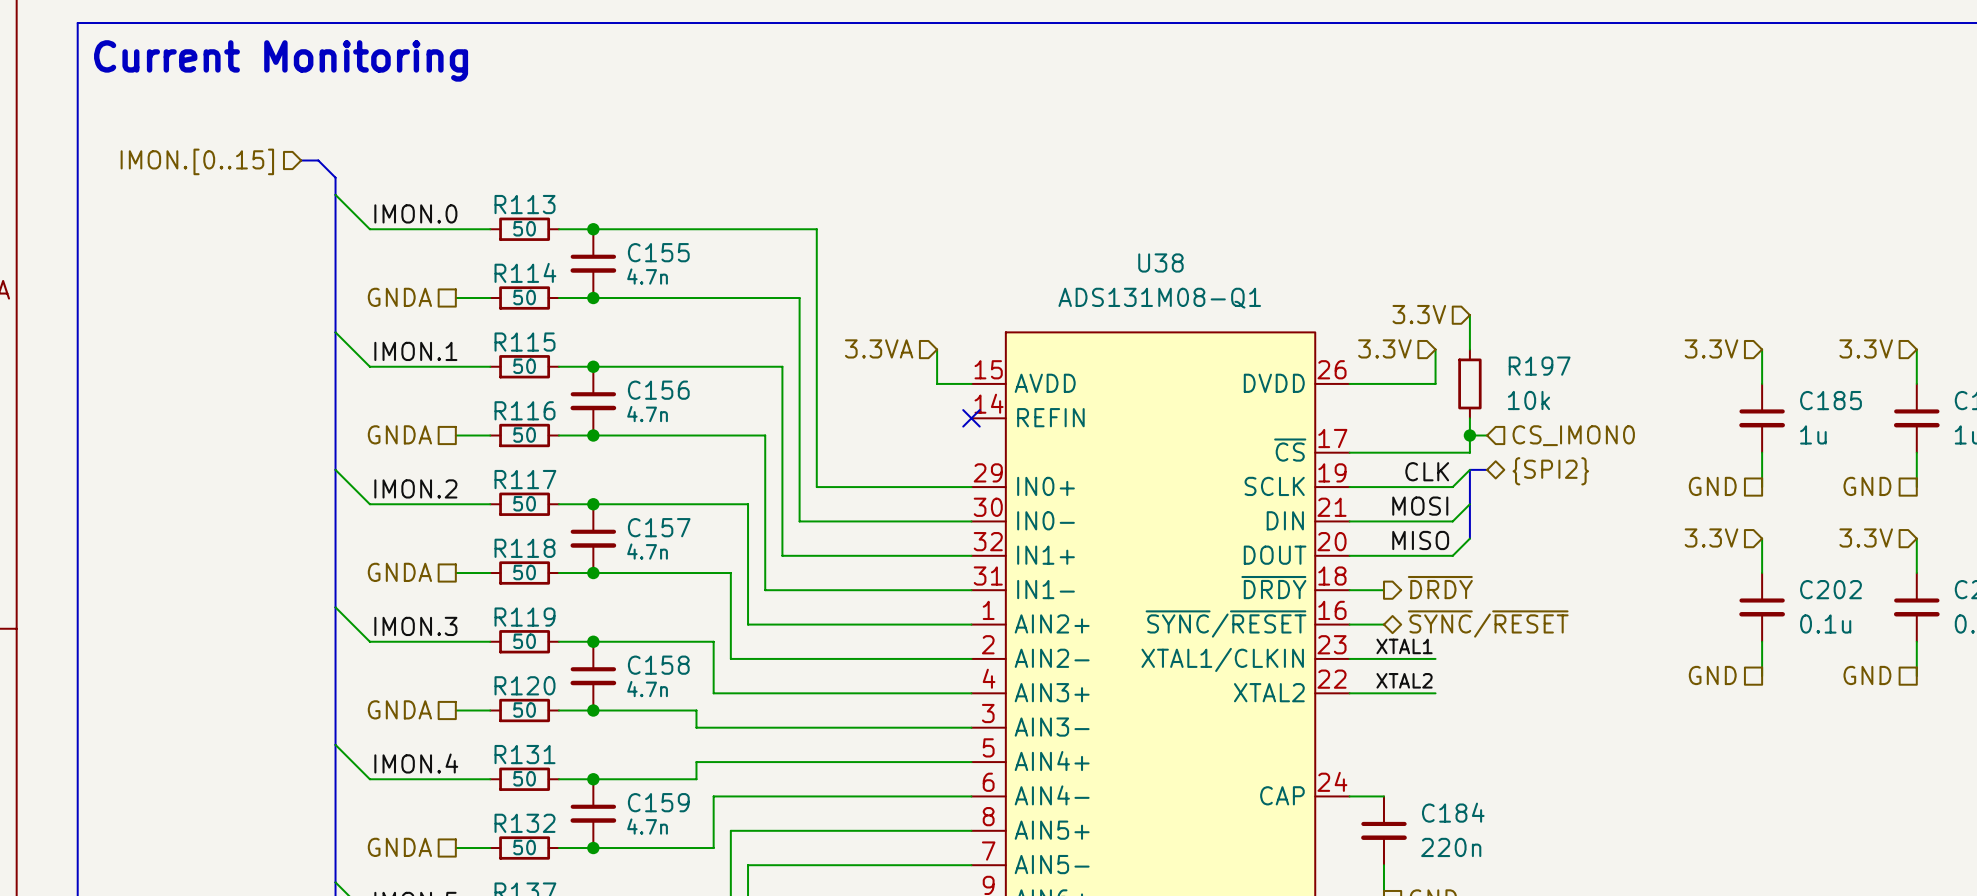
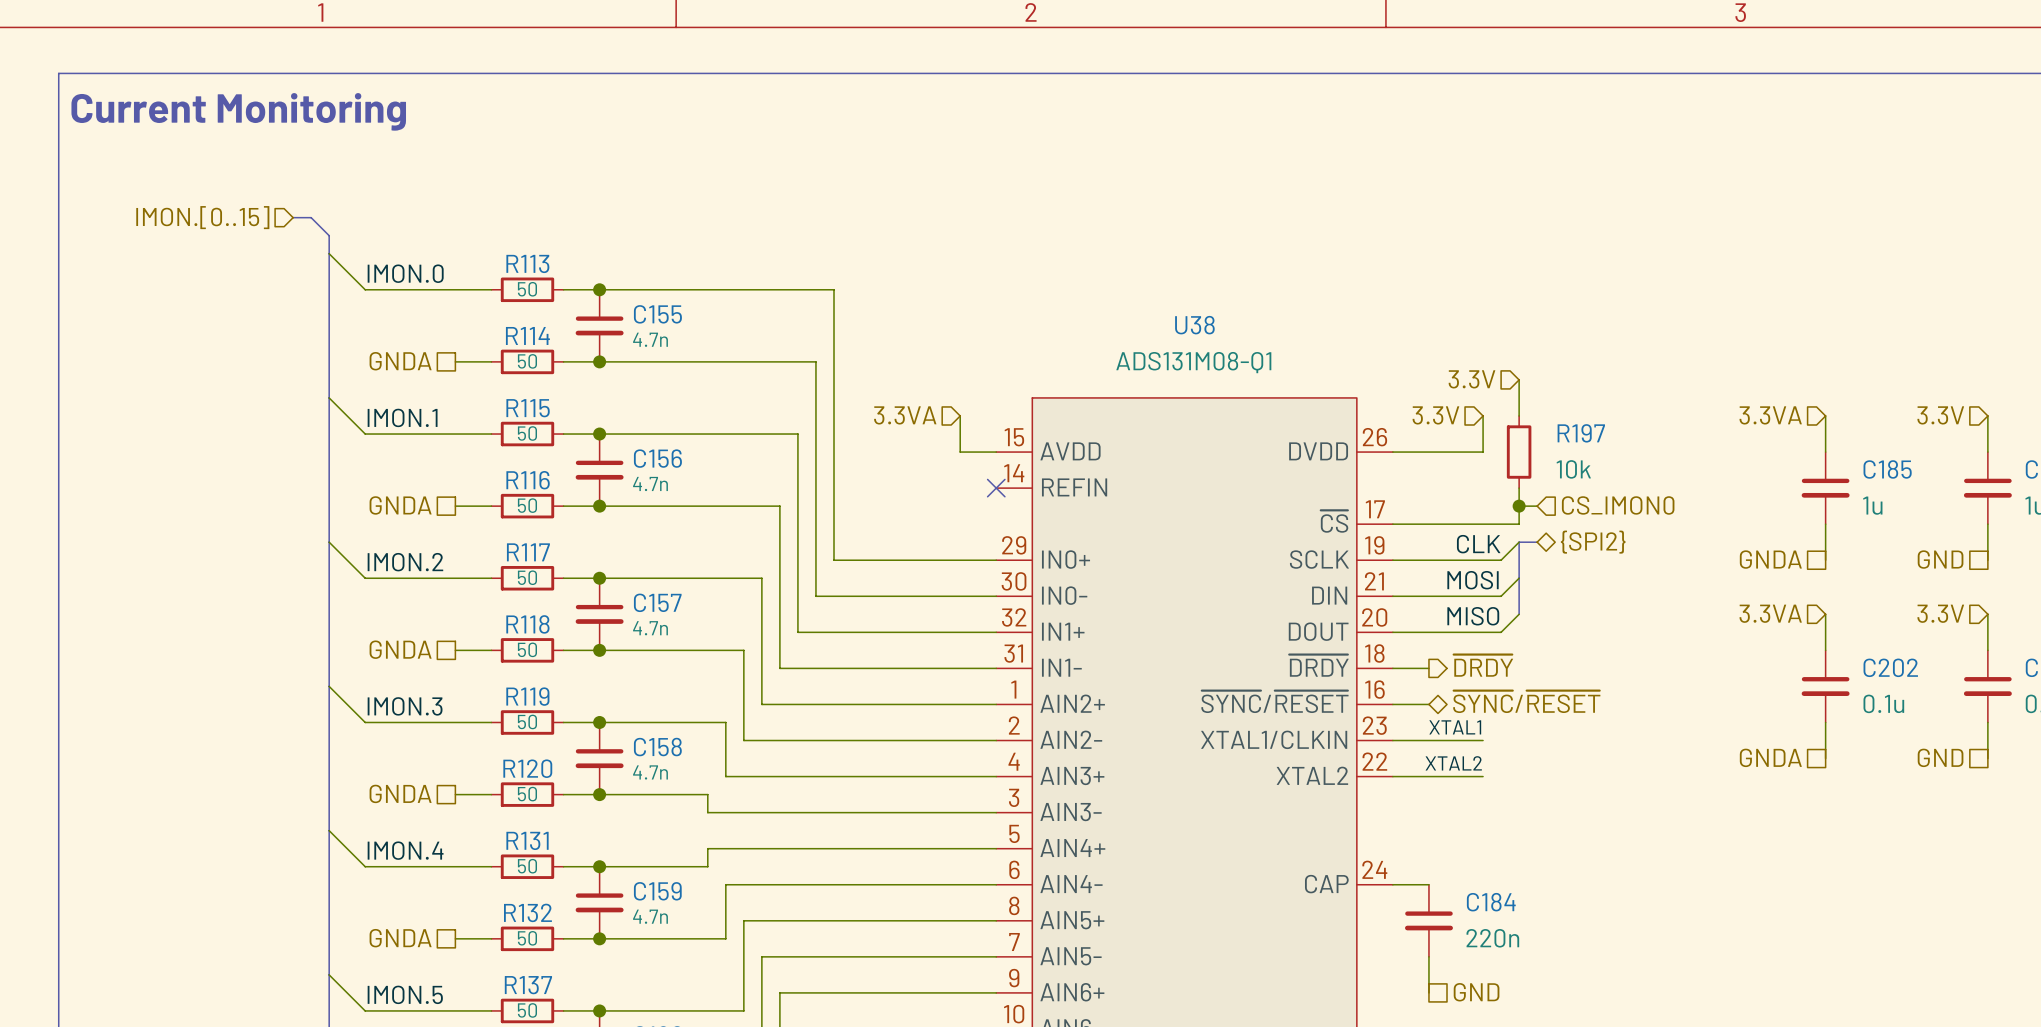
hierarchical label: 3.3V (1711, 348) -> 3.3VA (1770, 415)
hierarchical label: GND (1712, 486) -> GNDA (1770, 559)
hierarchical label: 3.3V (1711, 537) -> 3.3VA (1770, 613)
hierarchical label: GND (1712, 675) -> GNDA (1770, 757)

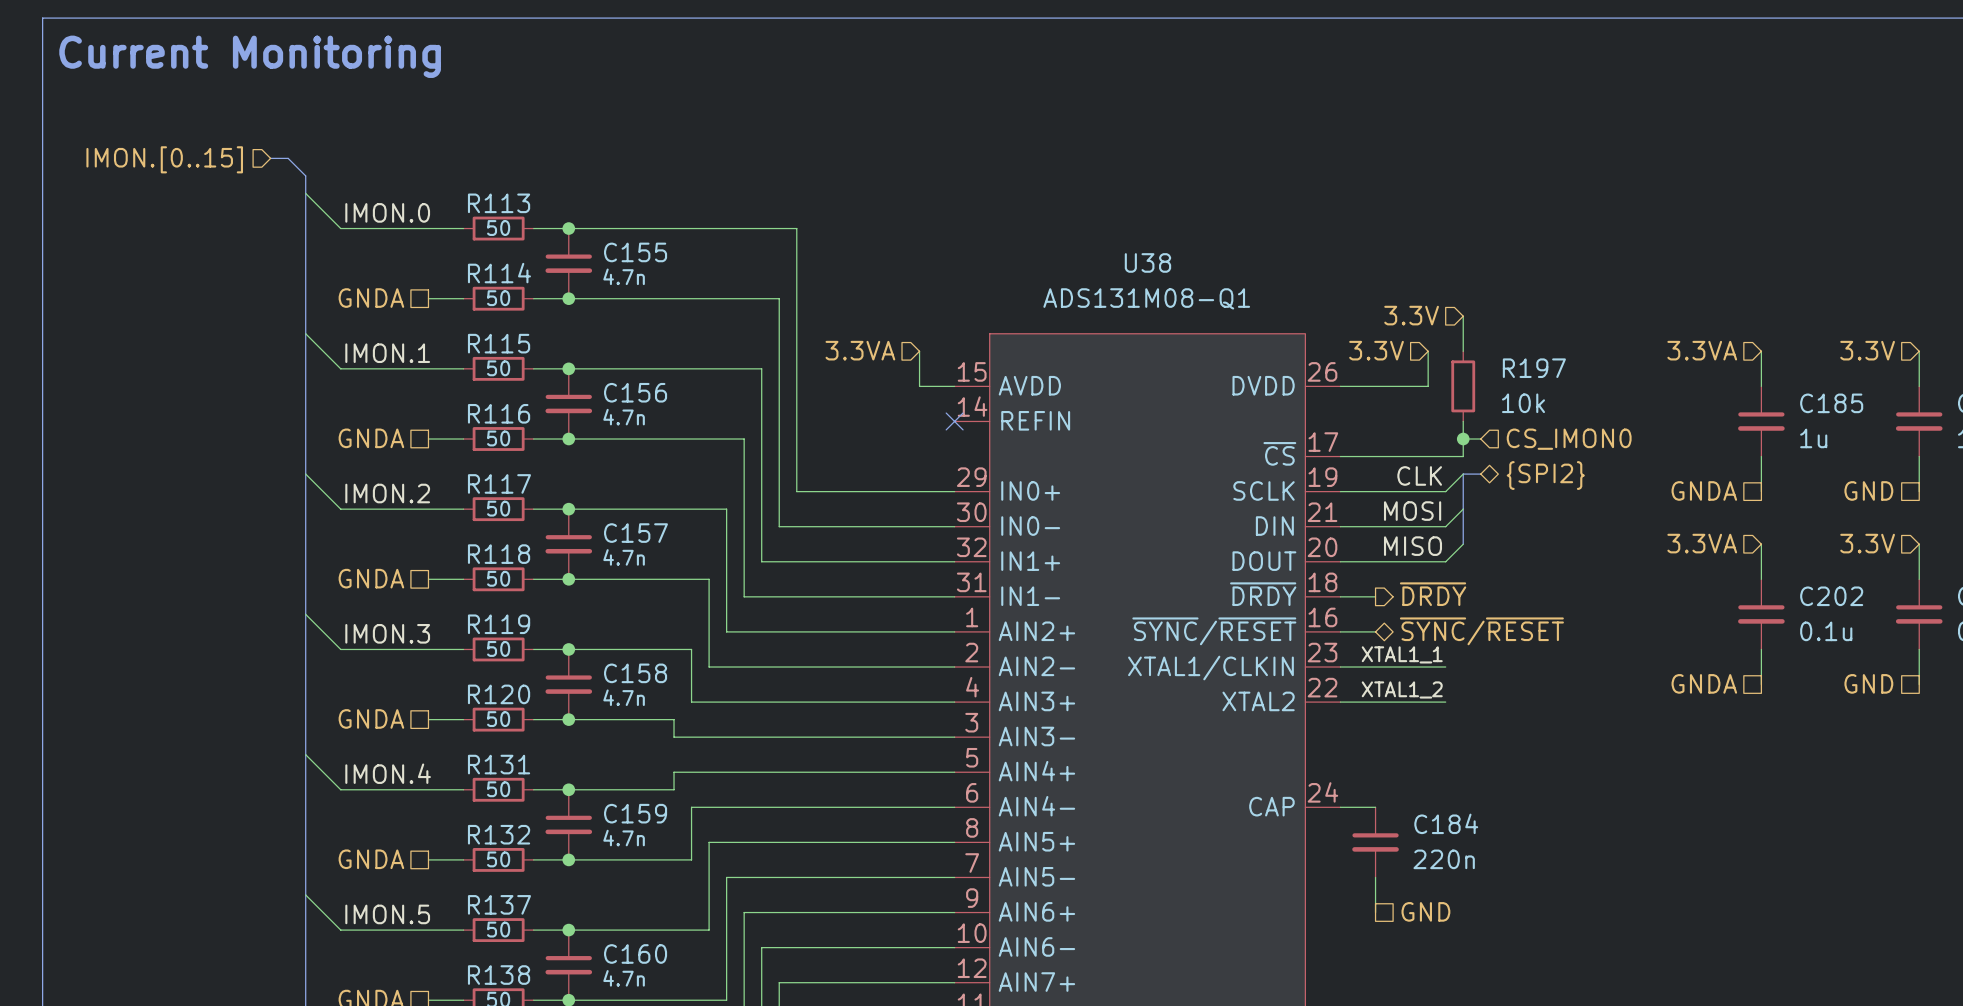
label: XTAL1 (1455, 727) -> XTAL1_1 (1402, 654)
wire: none -> (1428, 667) (1445, 667)
label: XTAL2 (1453, 763) -> XTAL1_2 (1402, 689)
wire: none -> (1428, 702) (1445, 702)

